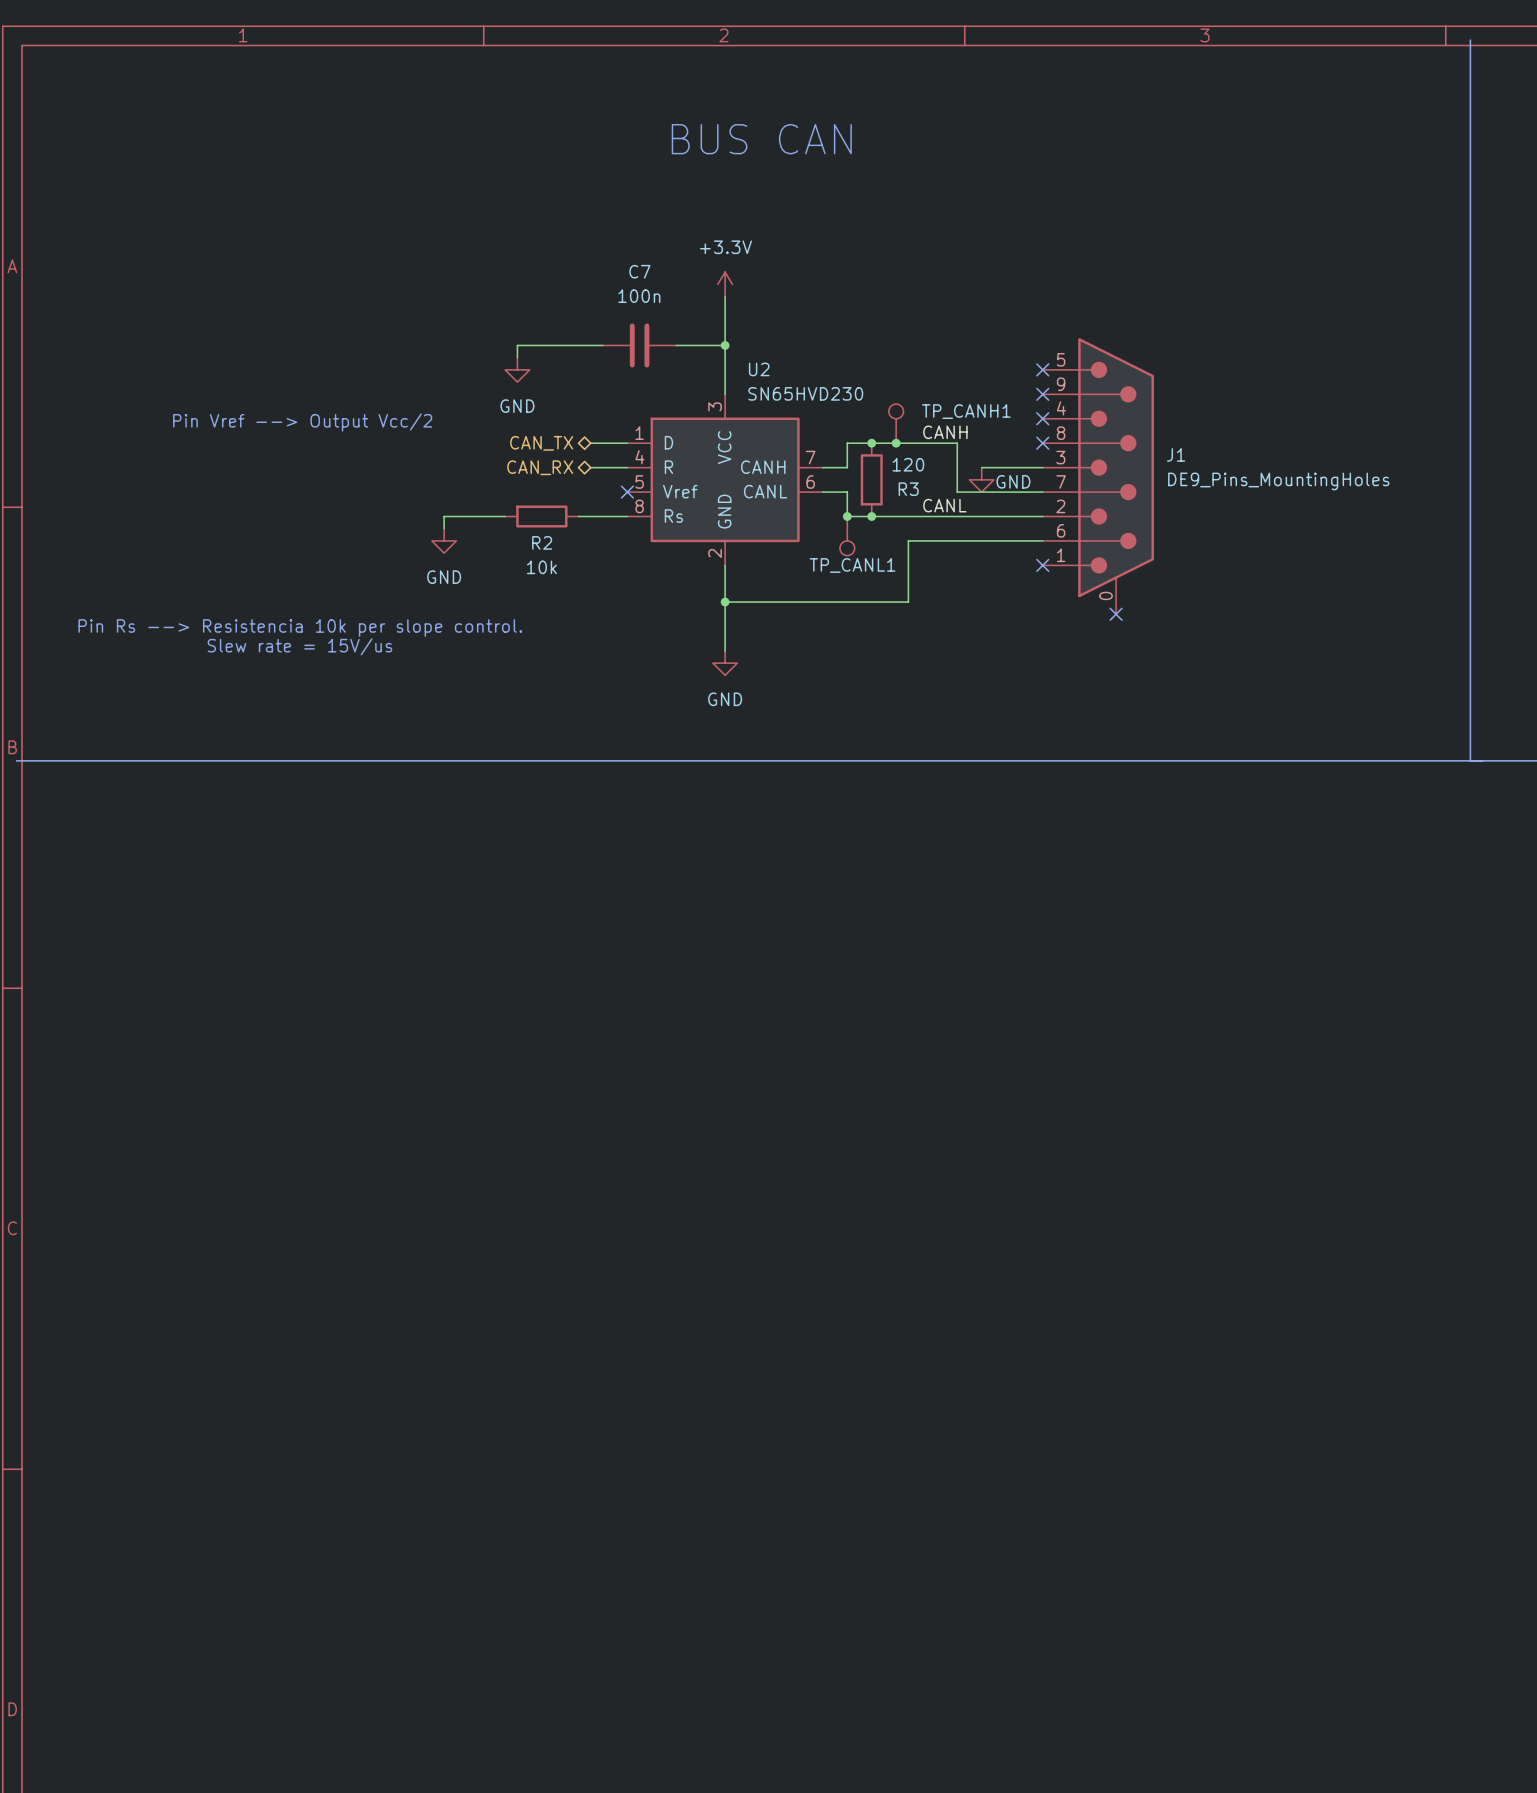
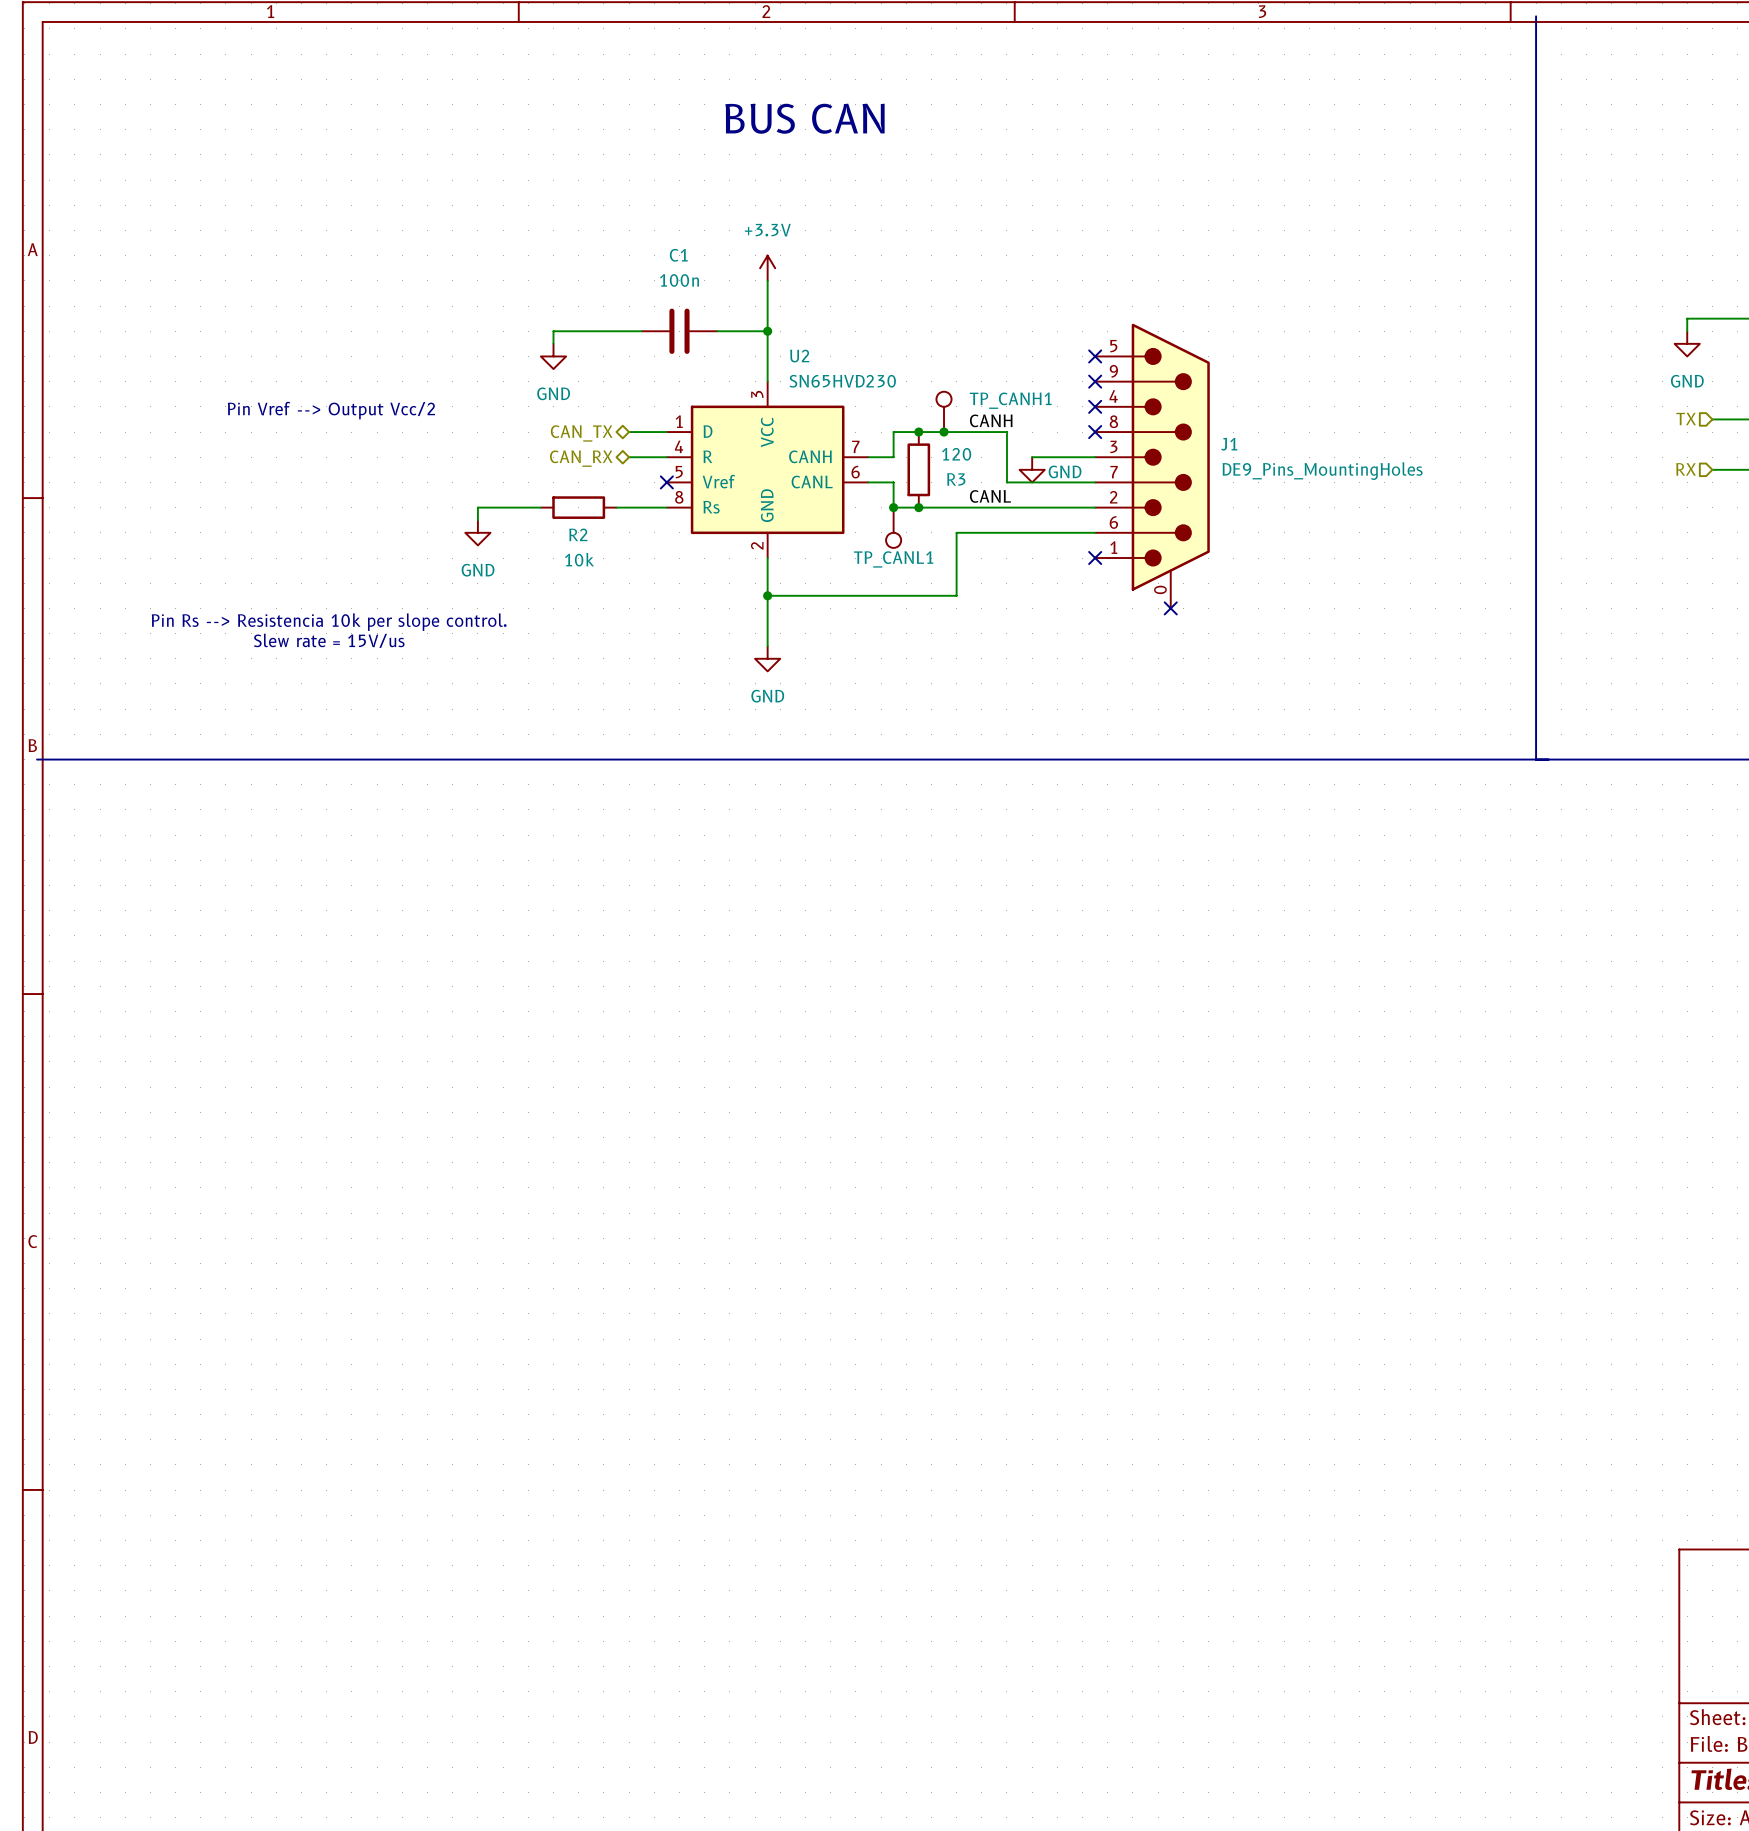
C7 name: C7 (639, 271) -> C1 (678, 255)

